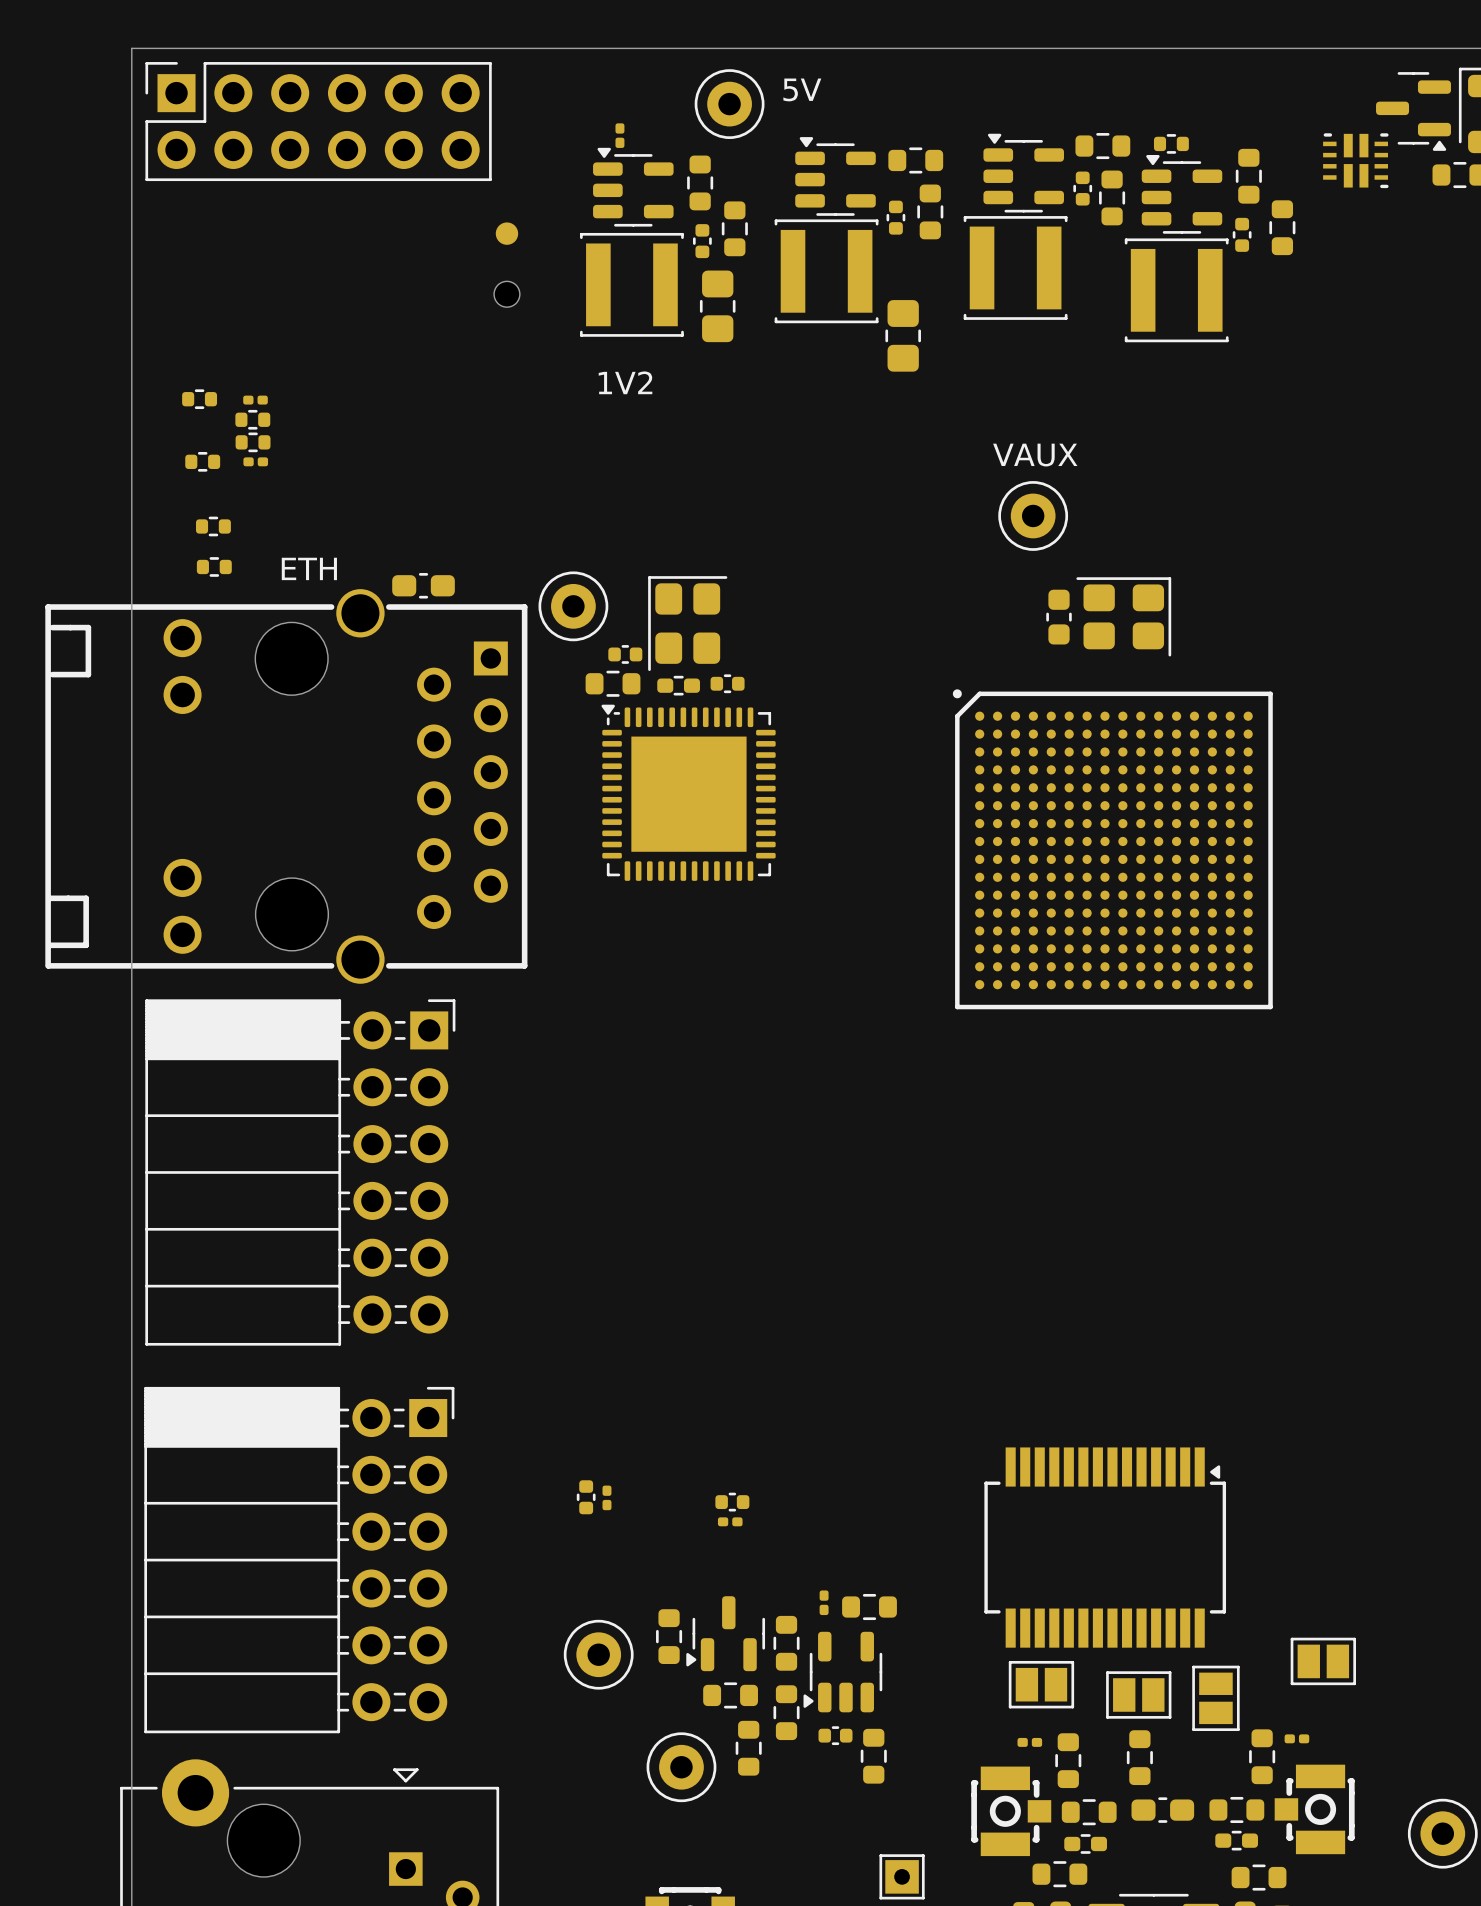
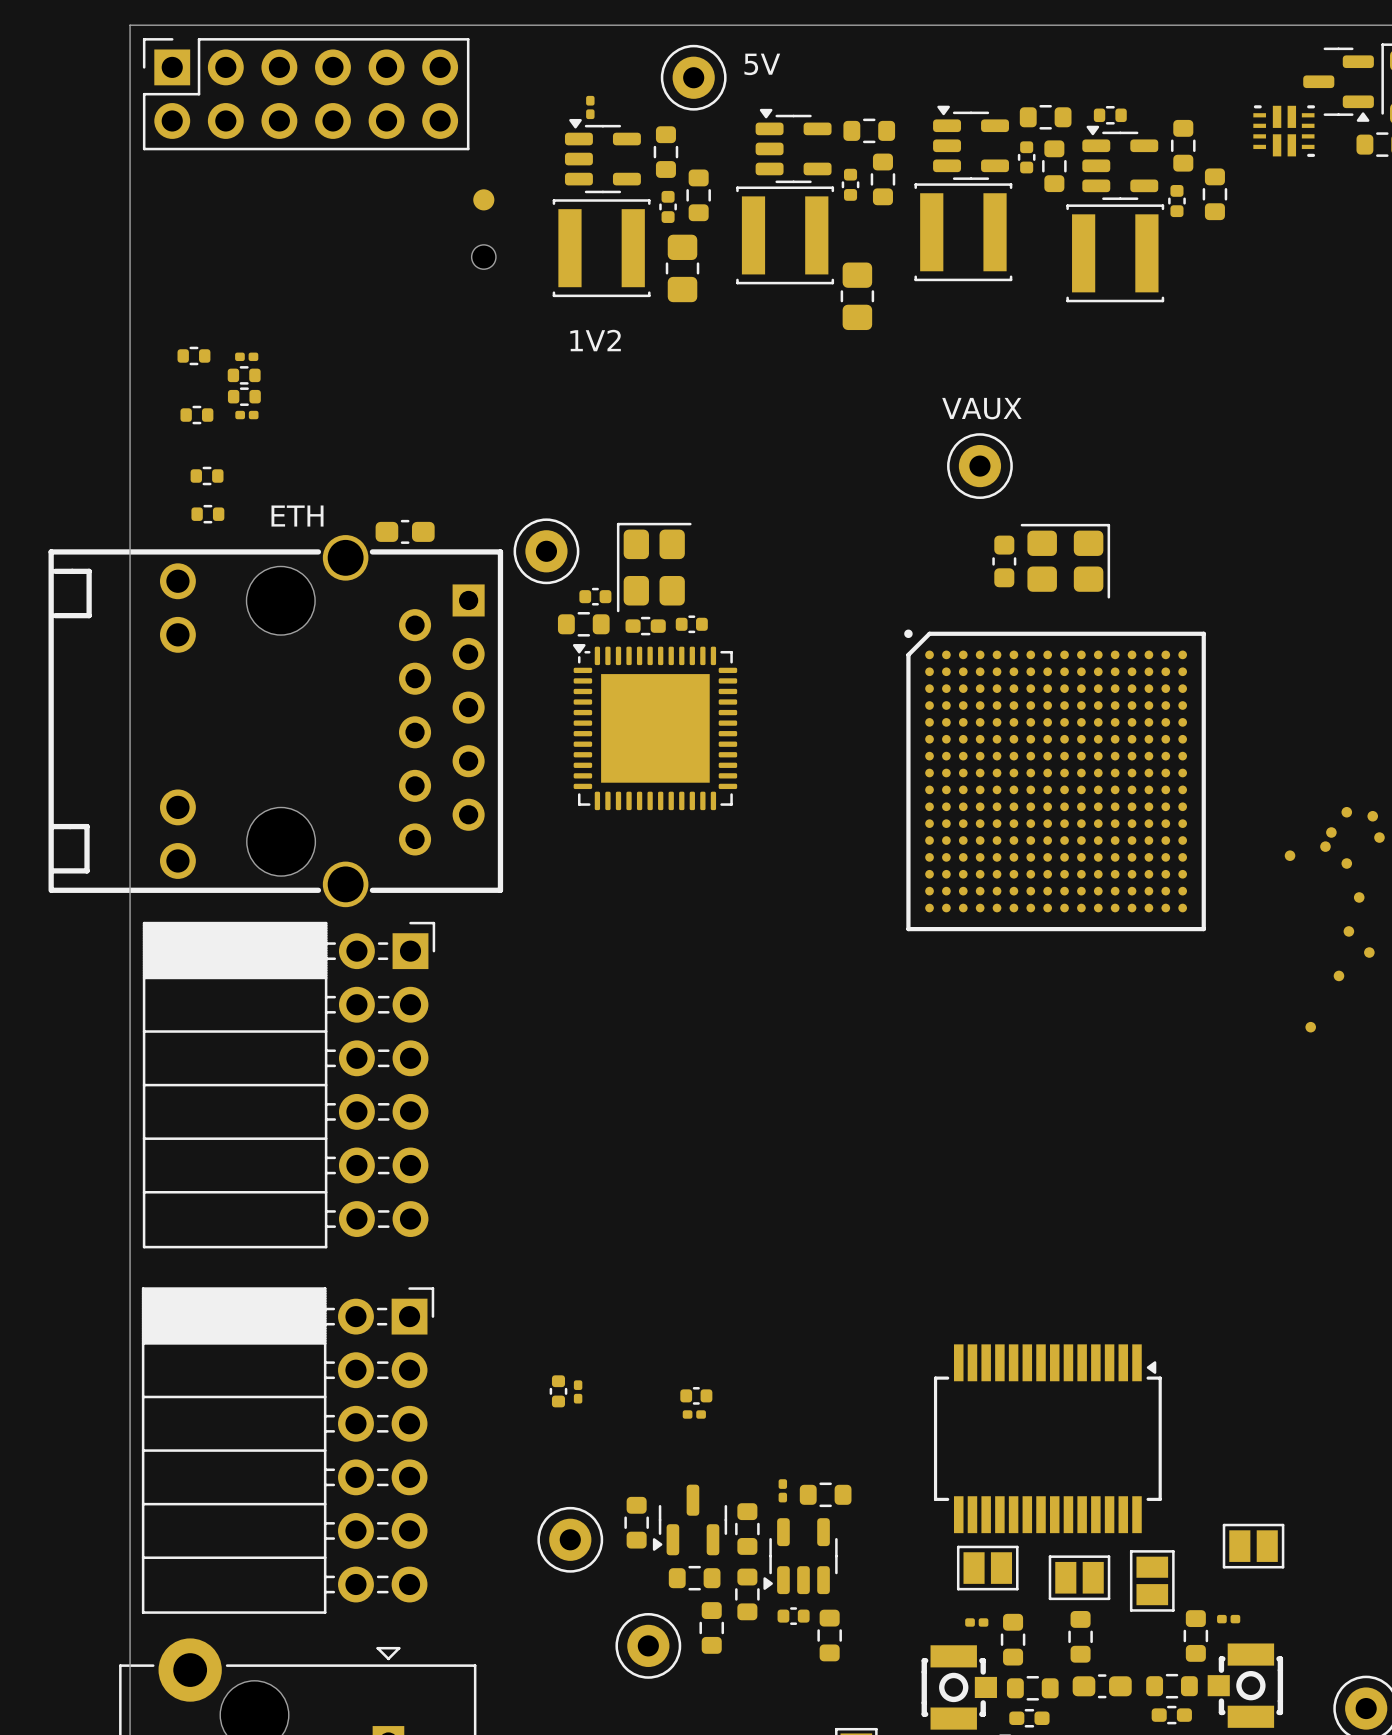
part: none -> (1346, 812)
part: none -> (1372, 816)
part: none -> (1331, 832)
part: none -> (1379, 837)
part: none -> (1325, 846)
part: none -> (1290, 855)
part: none -> (1346, 863)
part: none -> (1359, 897)
part: none -> (1348, 931)
part: none -> (1369, 952)
part: none -> (1338, 975)
part: none -> (1310, 1027)

